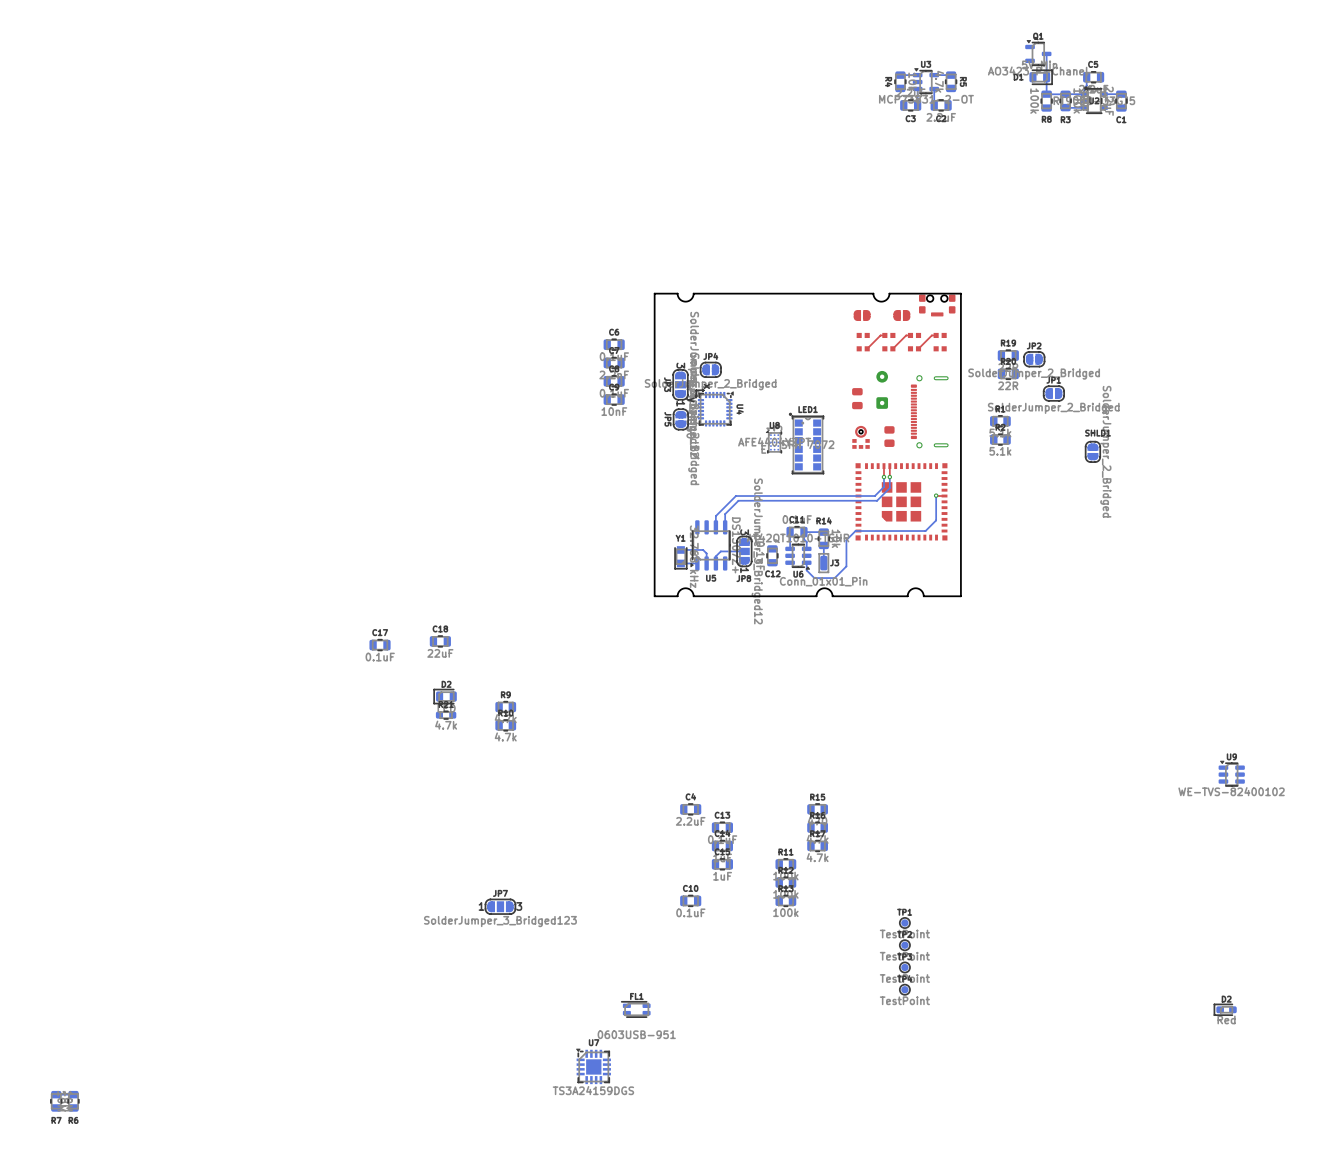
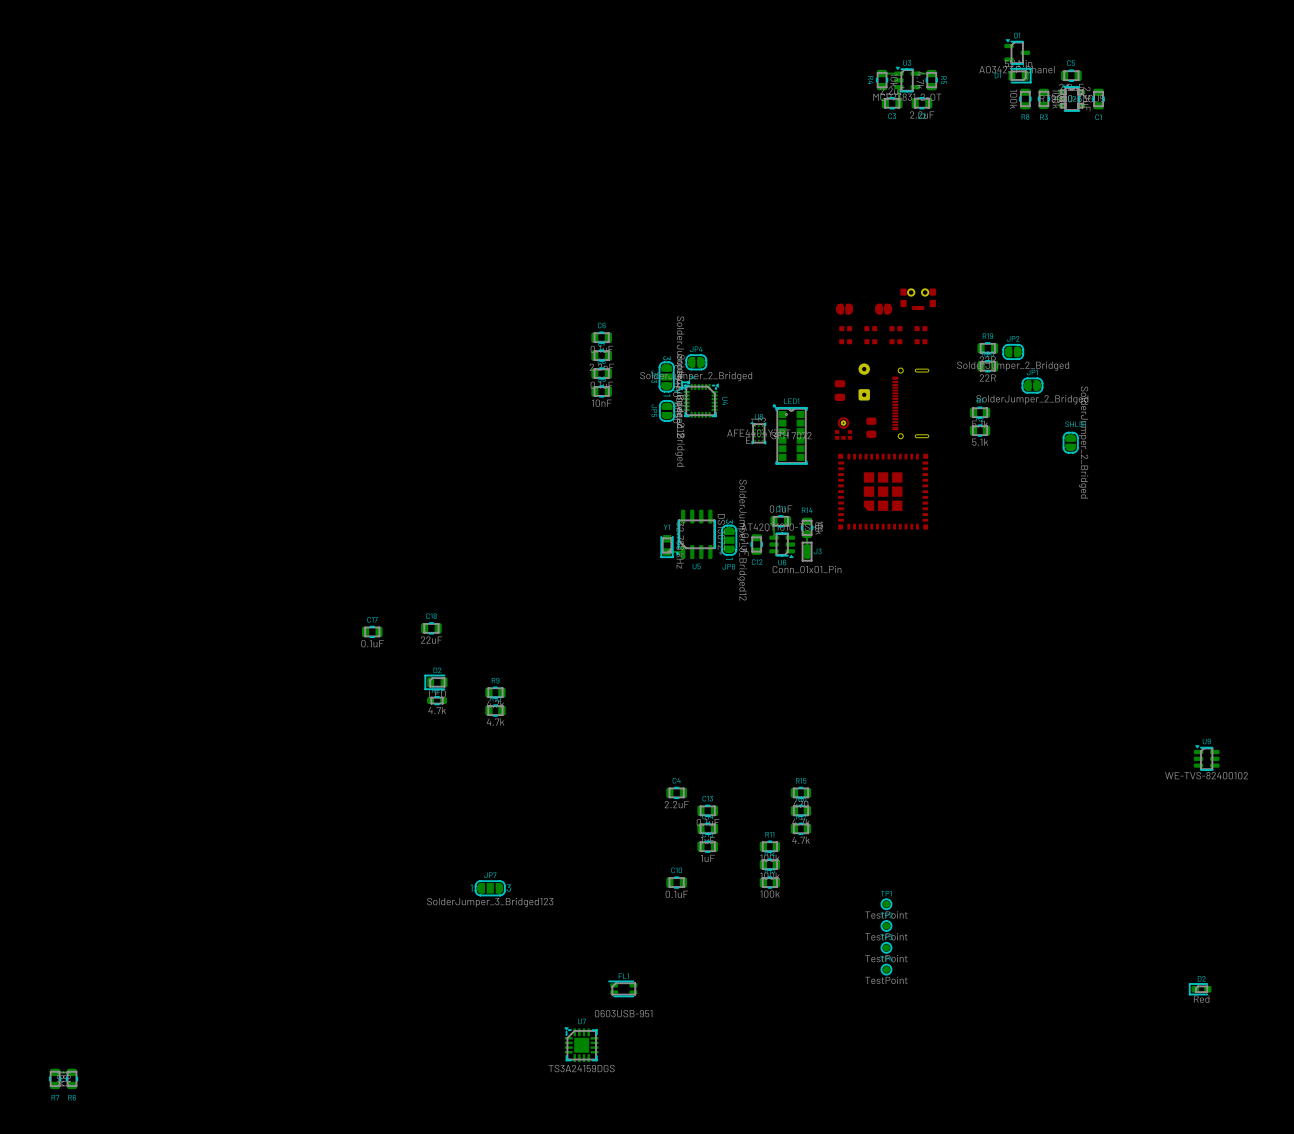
bottom track: (1046, 53) (1046, 94) (1084, 94) (1086, 77) -> none
bottom track: (934, 88) (934, 105) -> none
bottom track: (1121, 94) (1104, 94) -> none
bottom track: (1065, 107) (1084, 107) -> none
board edge: (960, 293) (889, 293) (887, 299) (881, 301) (875, 299) (873, 293) (693, 293) (691, 299) (685, 301) (679, 299) (677, 293) (654, 293) (654, 596) (677, 596) (679, 590) (685, 588) (691, 590) (693, 596) (816, 596) (818, 590) (824, 588) (830, 590) (832, 596) (907, 596) (910, 590) (915, 588) (921, 590) (923, 596) (960, 596) (960, 293) -> none
top track: (884, 335) (880, 335) (867, 348) -> none
top track: (910, 335) (906, 335) (892, 348) -> none
top track: (936, 335) (931, 335) (918, 348) -> none
top track: (883, 466) (883, 477) -> none
top track: (889, 466) (889, 477) -> none
bottom track: (883, 477) (883, 486) (874, 496) (735, 496) (715, 516) (715, 527) -> none
via: (883, 477) -> none
bottom track: (889, 477) (889, 487) (877, 500) (738, 500) (725, 514) (725, 527) -> none
via: (889, 477) -> none
bottom track: (936, 495) (936, 520) (925, 531) (855, 531) (846, 540) (846, 566) (834, 578) (814, 578) (806, 570) (806, 562) -> none
top track: (936, 495) (944, 496) -> none
via: (936, 495) -> none
bottom track: (823, 532) (803, 532) (806, 548) -> none
bottom track: (680, 549) (703, 549) (706, 553) (706, 563) -> none
bottom track: (744, 551) (720, 551) (715, 556) (715, 563) -> none

